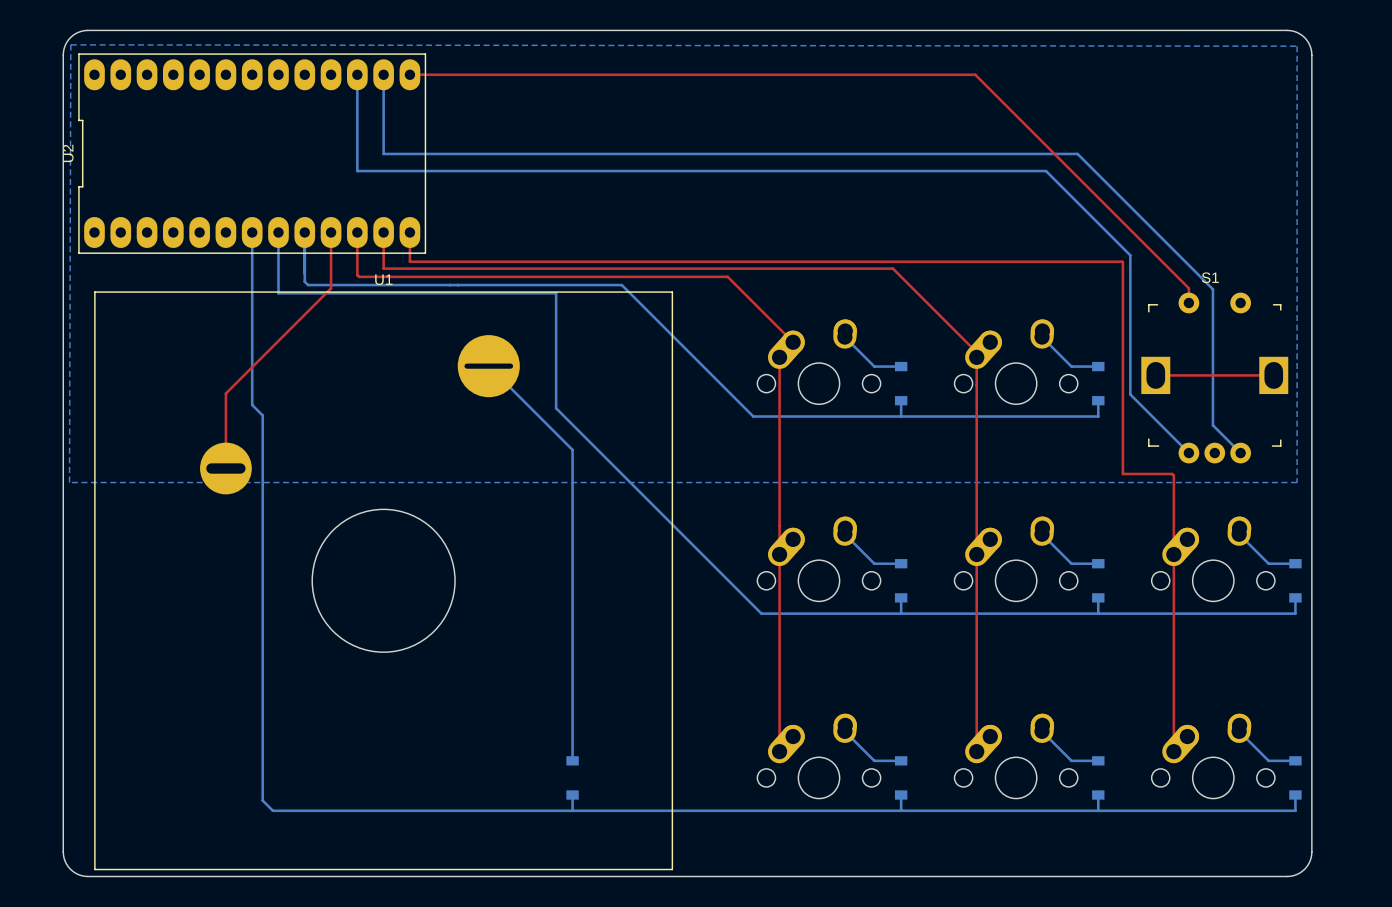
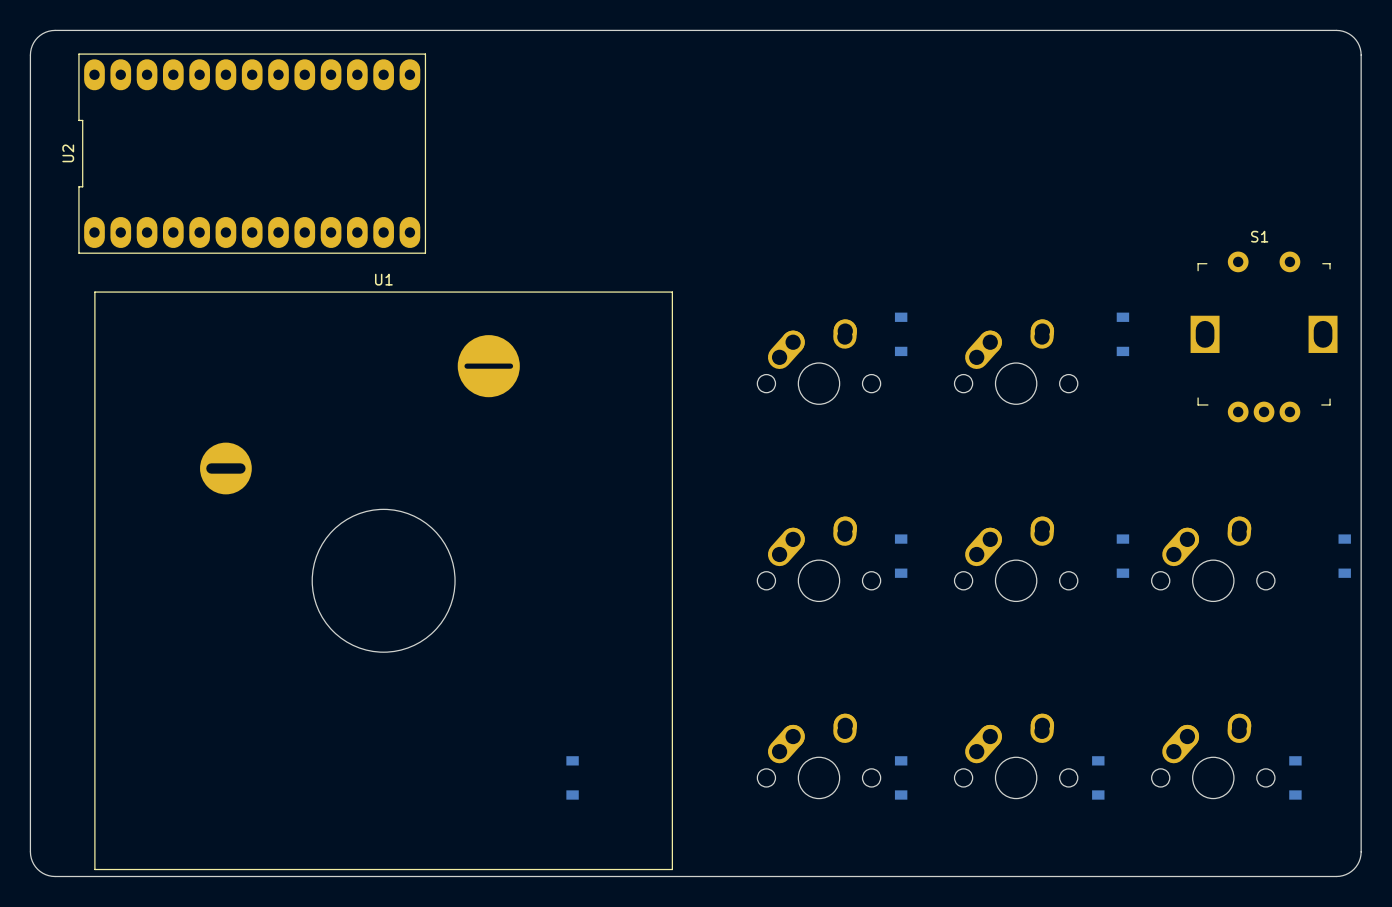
board edge: (87, 30) (78, 32) (70, 37) (65, 45) (63, 55) (63, 851) (65, 861) (70, 869) (78, 874) (87, 876) -> (87, 30) (45, 32) (33, 42) (30, 55) (30, 855) (35, 866) (45, 874) (87, 876)
board edge: (1287, 30) (1296, 32) (1304, 37) (1309, 45) (1311, 55) (1311, 851) (1309, 861) (1304, 869) (1296, 874) (1287, 876) -> (1287, 30) (1342, 31) (1356, 40) (1361, 55) (1360, 855) (1356, 866) (1342, 875) (1287, 876)
bottom zone outline: (70, 44) (1297, 46) (1297, 482) (69, 482) (70, 44) -> none
bottom track: (357, 74) (357, 171) (1046, 171) (1130, 255) (1130, 394) (1188, 453) -> none
bottom track: (383, 74) (383, 153) (1077, 153) (1212, 289) (1212, 425) (1240, 453) -> none
top track: (409, 74) (975, 74) (1188, 288) (1188, 302) -> none
bottom track: (252, 232) (252, 404) (262, 415) (262, 800) (272, 810) (1295, 810) (1295, 795) -> none
bottom track: (278, 232) (278, 293) (556, 293) (556, 408) (761, 613) (1295, 613) (1295, 597) -> none
bottom track: (304, 232) (304, 281) (308, 285) (621, 285) (753, 416) (1098, 416) (1098, 400) -> none
top track: (331, 232) (331, 288) (225, 393) (225, 468) -> none
top track: (357, 232) (357, 275) (358, 276) (727, 276) (793, 342) -> none
top track: (383, 232) (383, 268) (892, 268) (976, 352) (976, 751) -> none
top track: (409, 232) (409, 261) (1122, 261) (1122, 473) (1172, 473) (1173, 475) (1173, 751) -> none
bottom track: (844, 337) (874, 366) (901, 366) -> none
bottom track: (1042, 337) (1071, 366) (1098, 366) -> none
top track: (779, 357) (779, 751) -> none
bottom track: (488, 366) (572, 449) (572, 760) -> none
top track: (1155, 375) (1273, 375) -> none
S1 position: (1214, 378) -> (1264, 336)
part position: (901, 383) -> (901, 334)
part position: (1098, 383) -> (1122, 334)
bottom track: (901, 400) (901, 416) -> none
bottom track: (844, 534) (874, 563) (901, 563) -> none
bottom track: (1042, 534) (1071, 563) (1098, 563) -> none
bottom track: (1239, 534) (1268, 563) (1295, 563) -> none
part position: (901, 580) -> (901, 556)
part position: (1098, 580) -> (1122, 556)
part position: (1295, 580) -> (1344, 556)
bottom track: (901, 597) (901, 613) -> none
bottom track: (1098, 597) (1098, 613) -> none
bottom track: (844, 731) (874, 760) (901, 760) -> none
bottom track: (1042, 731) (1071, 760) (1098, 760) -> none
bottom track: (1239, 731) (1268, 760) (1295, 760) -> none
bottom track: (572, 795) (572, 810) -> none
bottom track: (901, 795) (901, 810) -> none
bottom track: (1098, 795) (1098, 810) -> none

